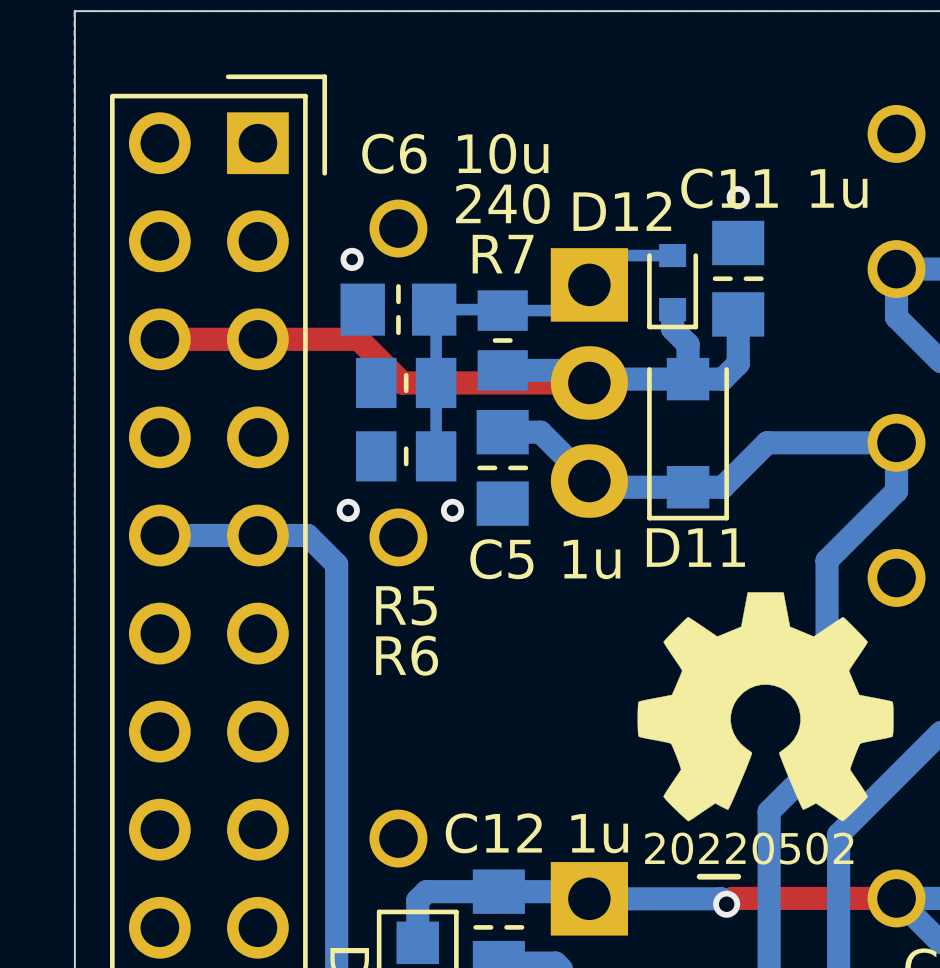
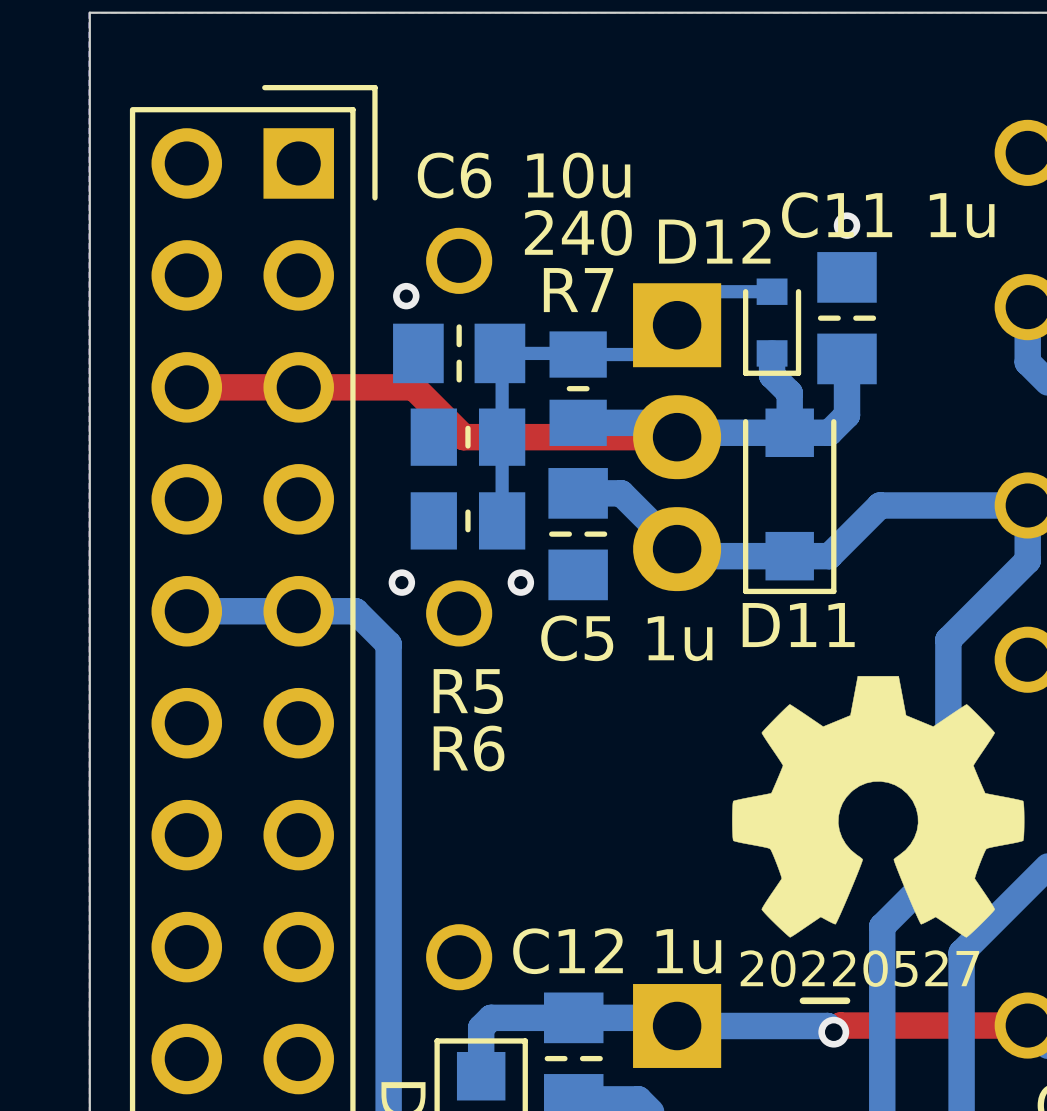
drawing shape: [645, 832, 854, 880] -> [740, 950, 980, 1005]

